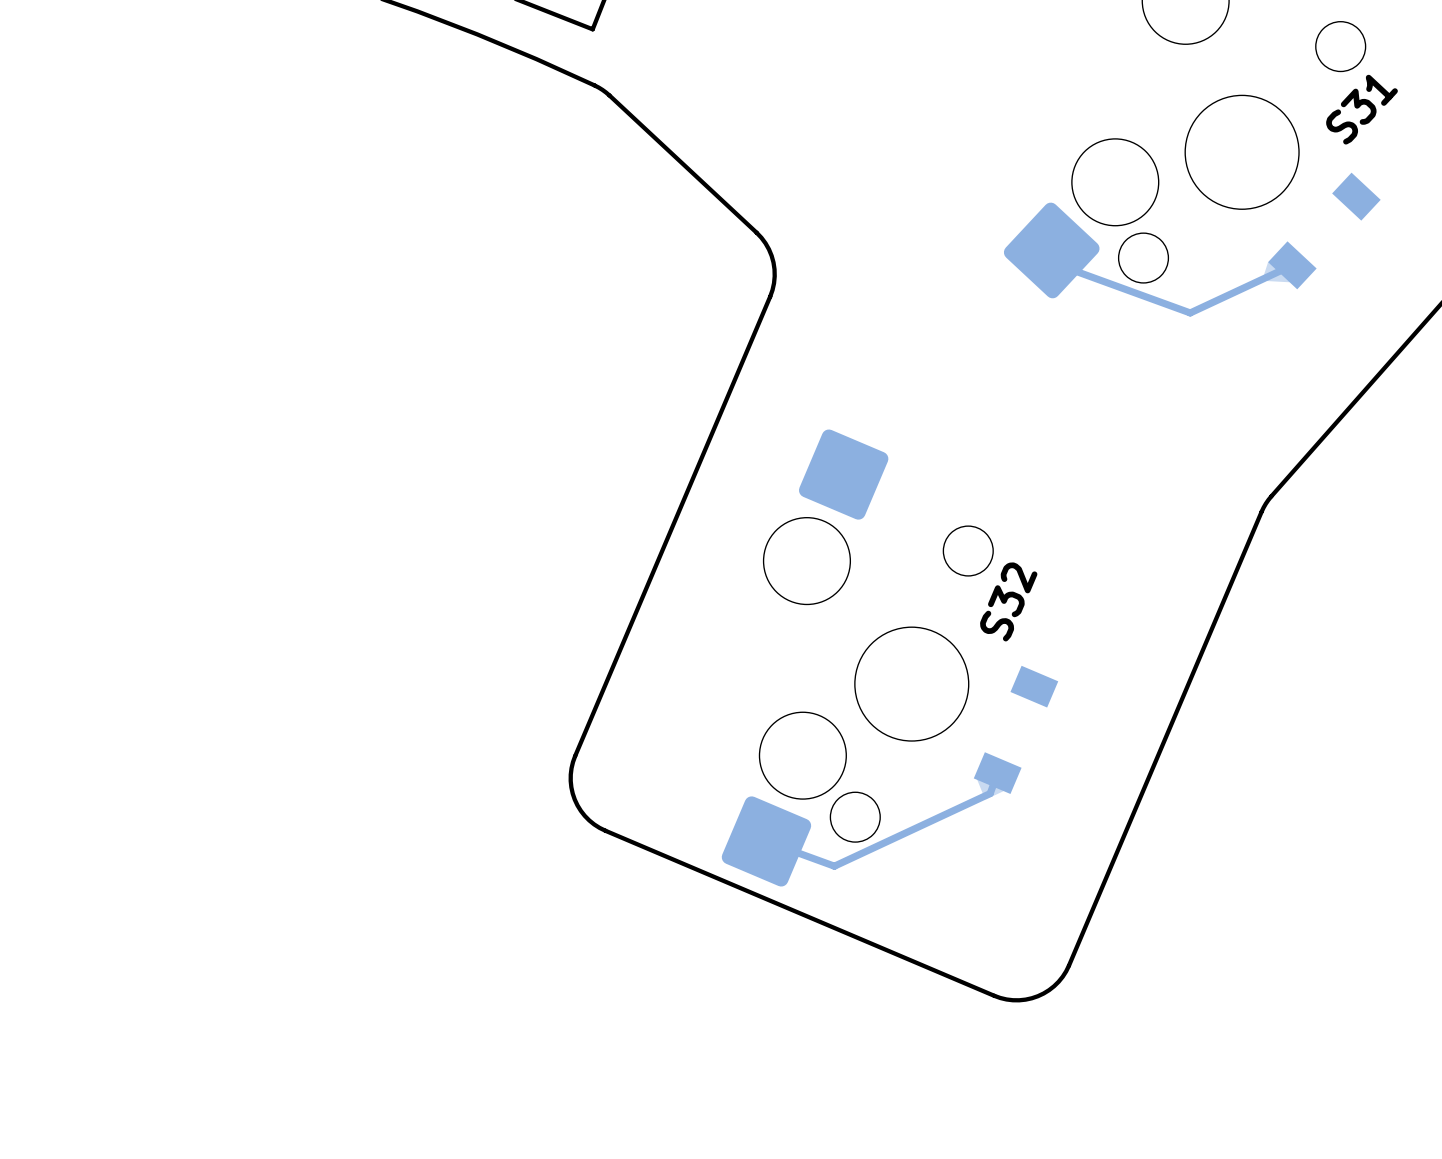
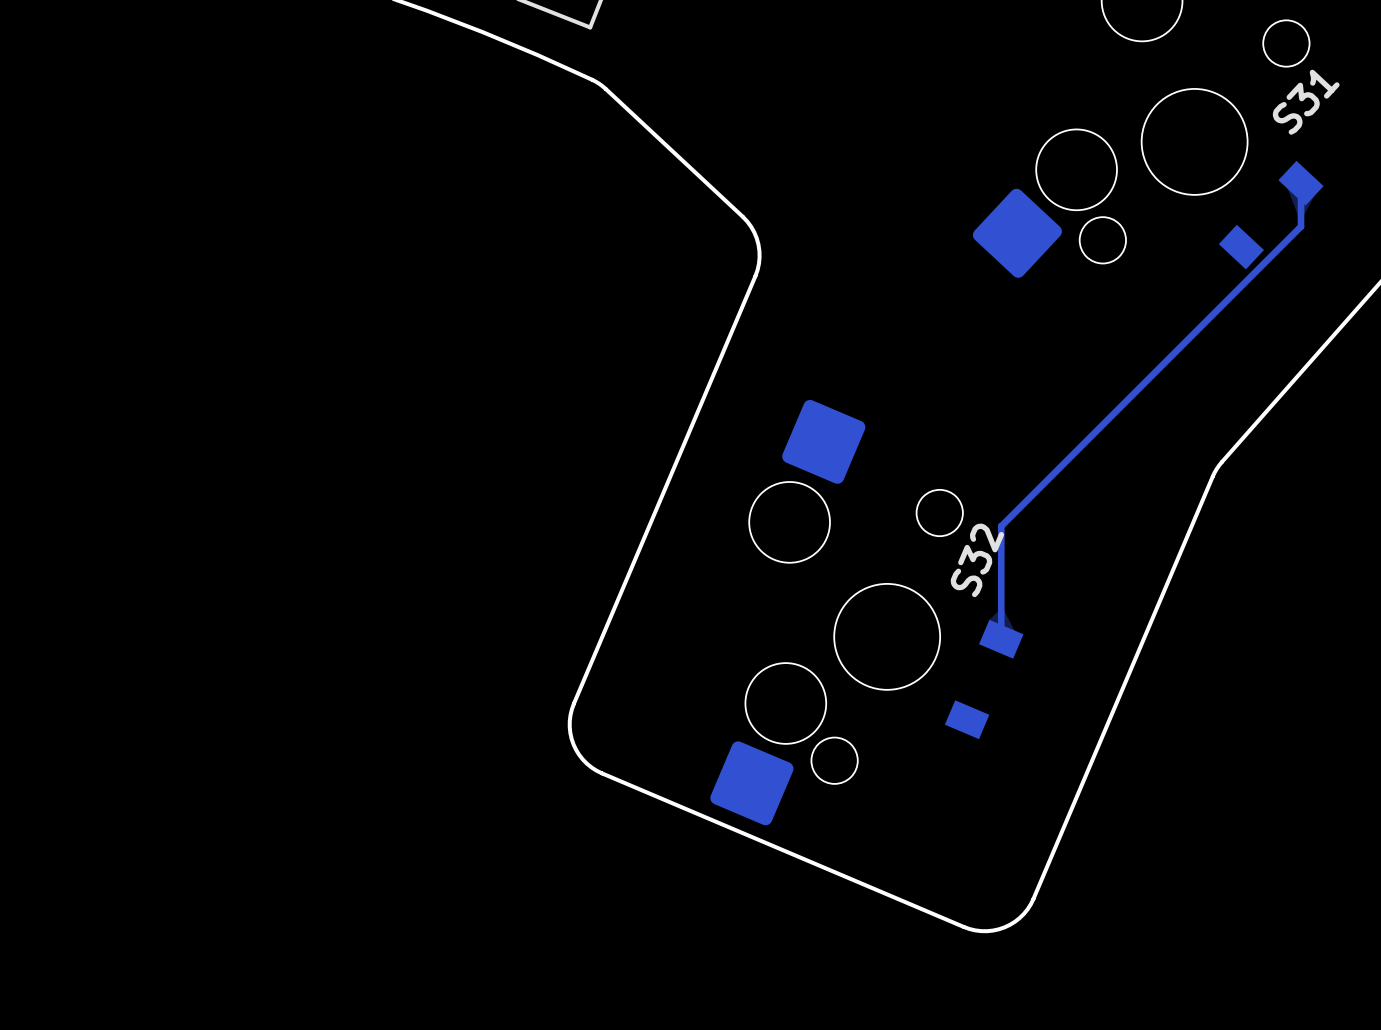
bottom track: none -> (1301, 183) (1301, 226) (1001, 526) (1001, 639)
bottom track: (1051, 250) (1058, 264) (1190, 312) (1292, 265) -> none
bottom track: (997, 773) (990, 793) (834, 866) (766, 841) -> none

